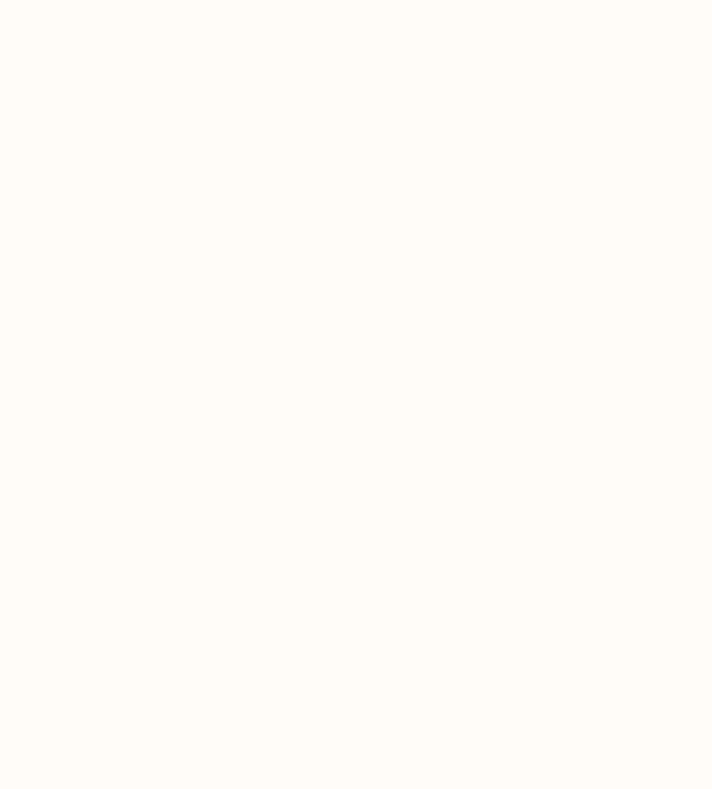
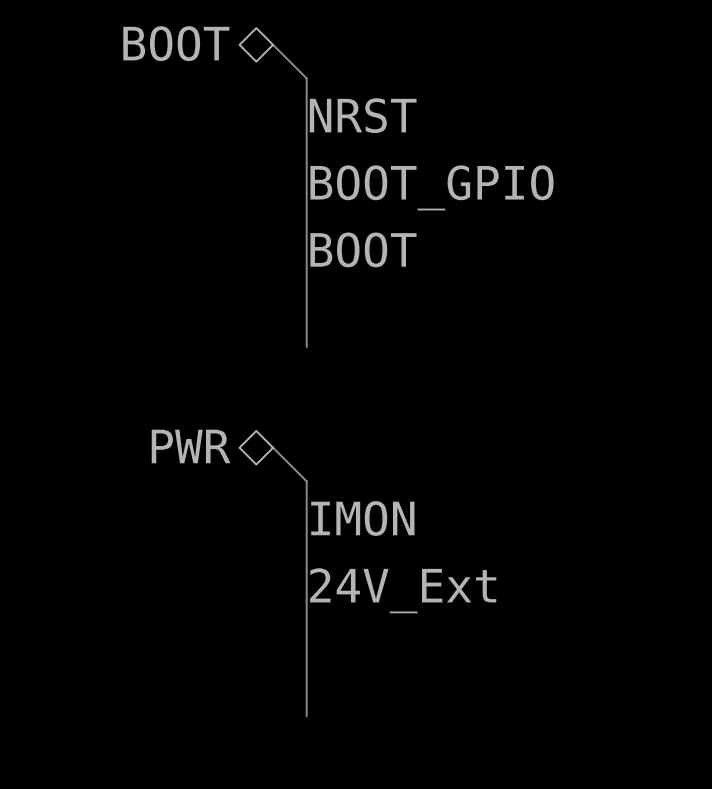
hierarchical label: none -> BOOT (176, 43)
bus: none -> (273, 44) (306, 78) (306, 347)
label: none -> NRST (363, 115)
label: none -> BOOT_GPIO (431, 187)
label: none -> BOOT (363, 249)
hierarchical label: none -> PWR (191, 446)
bus: none -> (273, 447) (306, 481) (306, 716)
label: none -> IMON (362, 518)
label: none -> 24V_Ext (403, 590)

